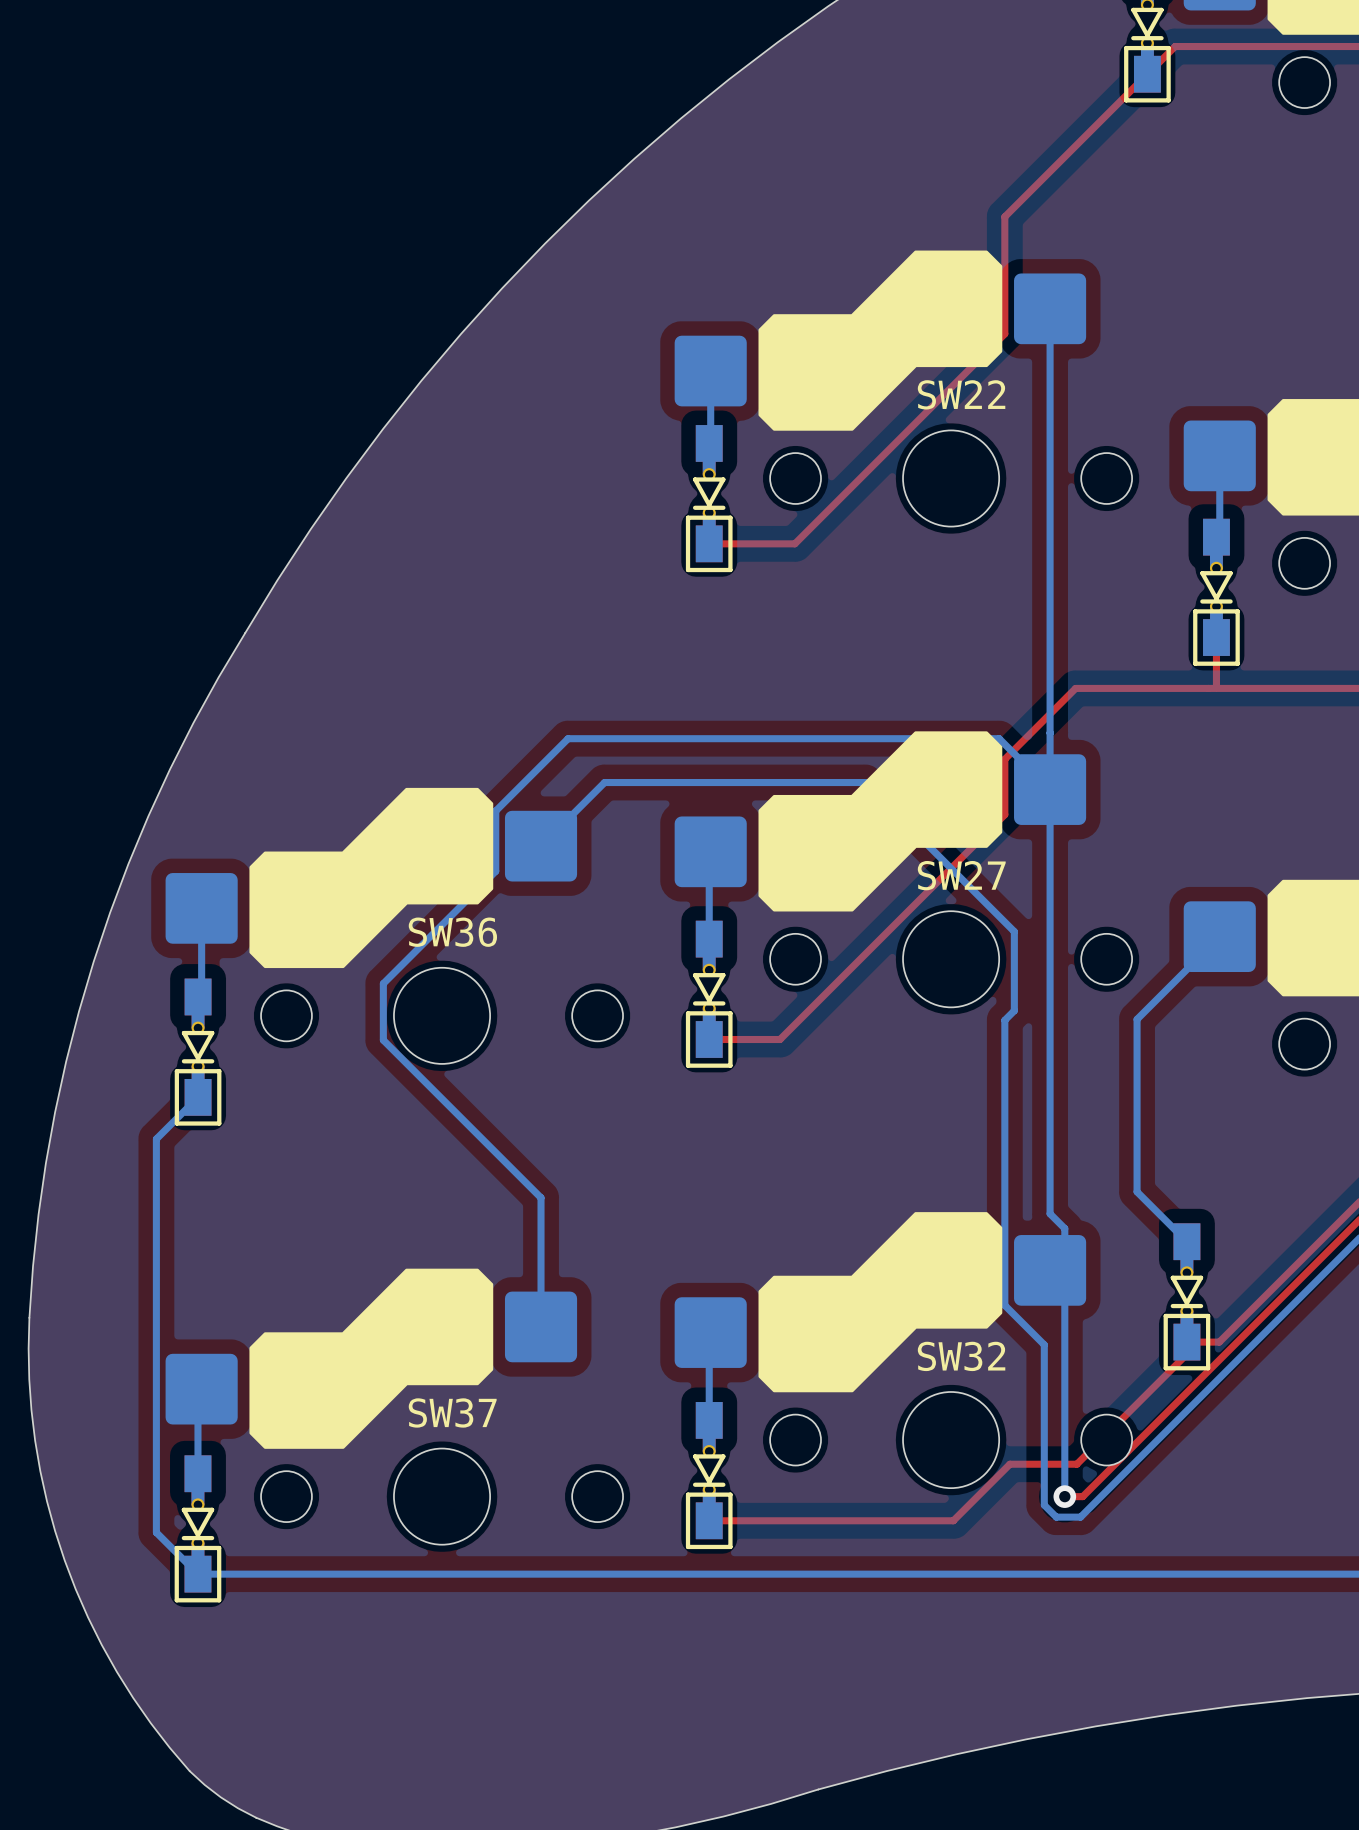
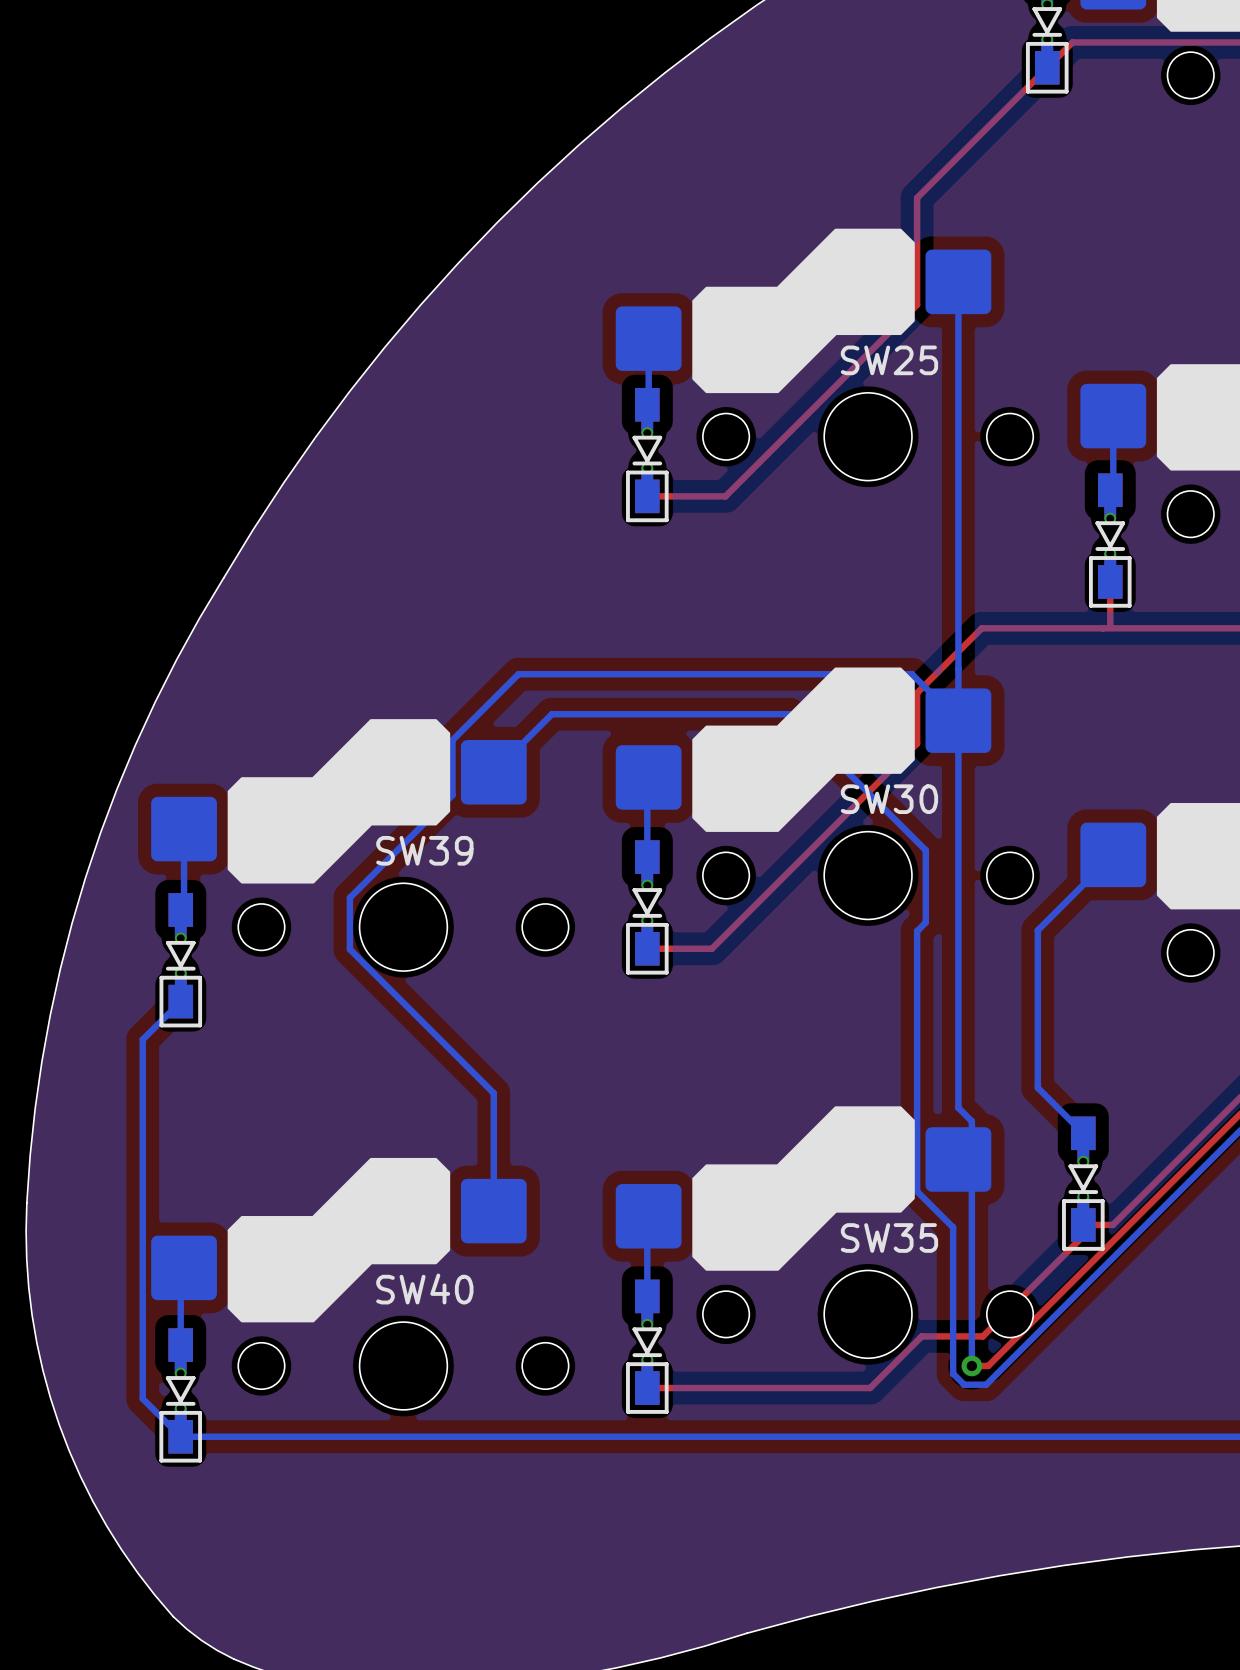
SW22 name: SW22 (961, 394) -> SW25 (889, 360)
SW27 name: SW27 (961, 875) -> SW30 (889, 799)
SW36 name: SW36 (452, 932) -> SW39 (424, 850)
SW32 name: SW32 (961, 1356) -> SW35 (889, 1237)
SW37 name: SW37 (452, 1412) -> SW40 (424, 1289)

